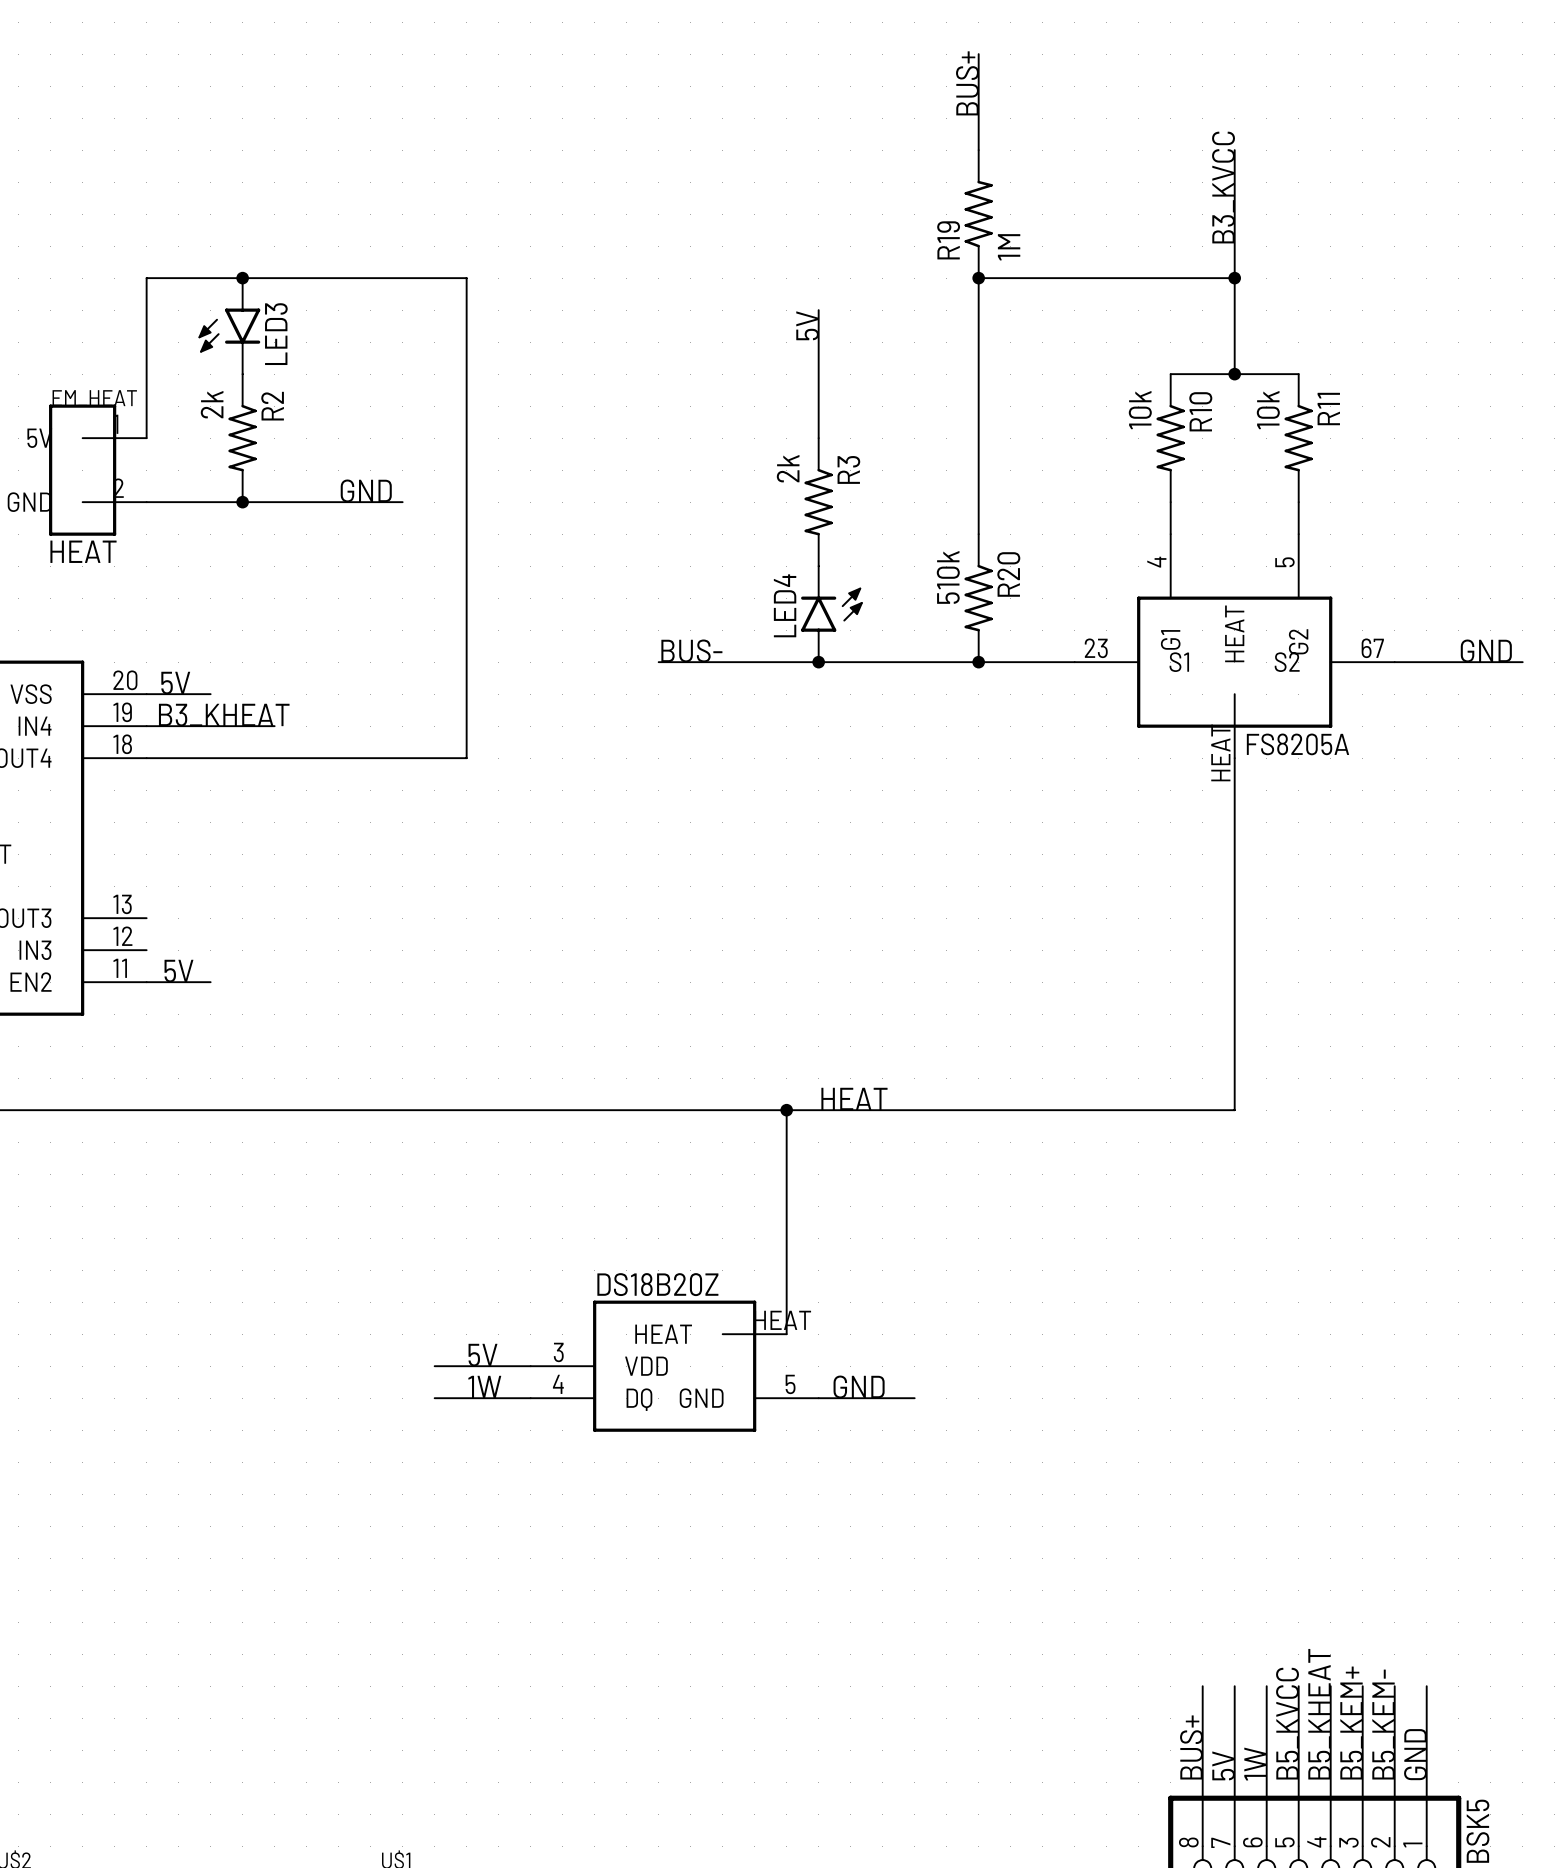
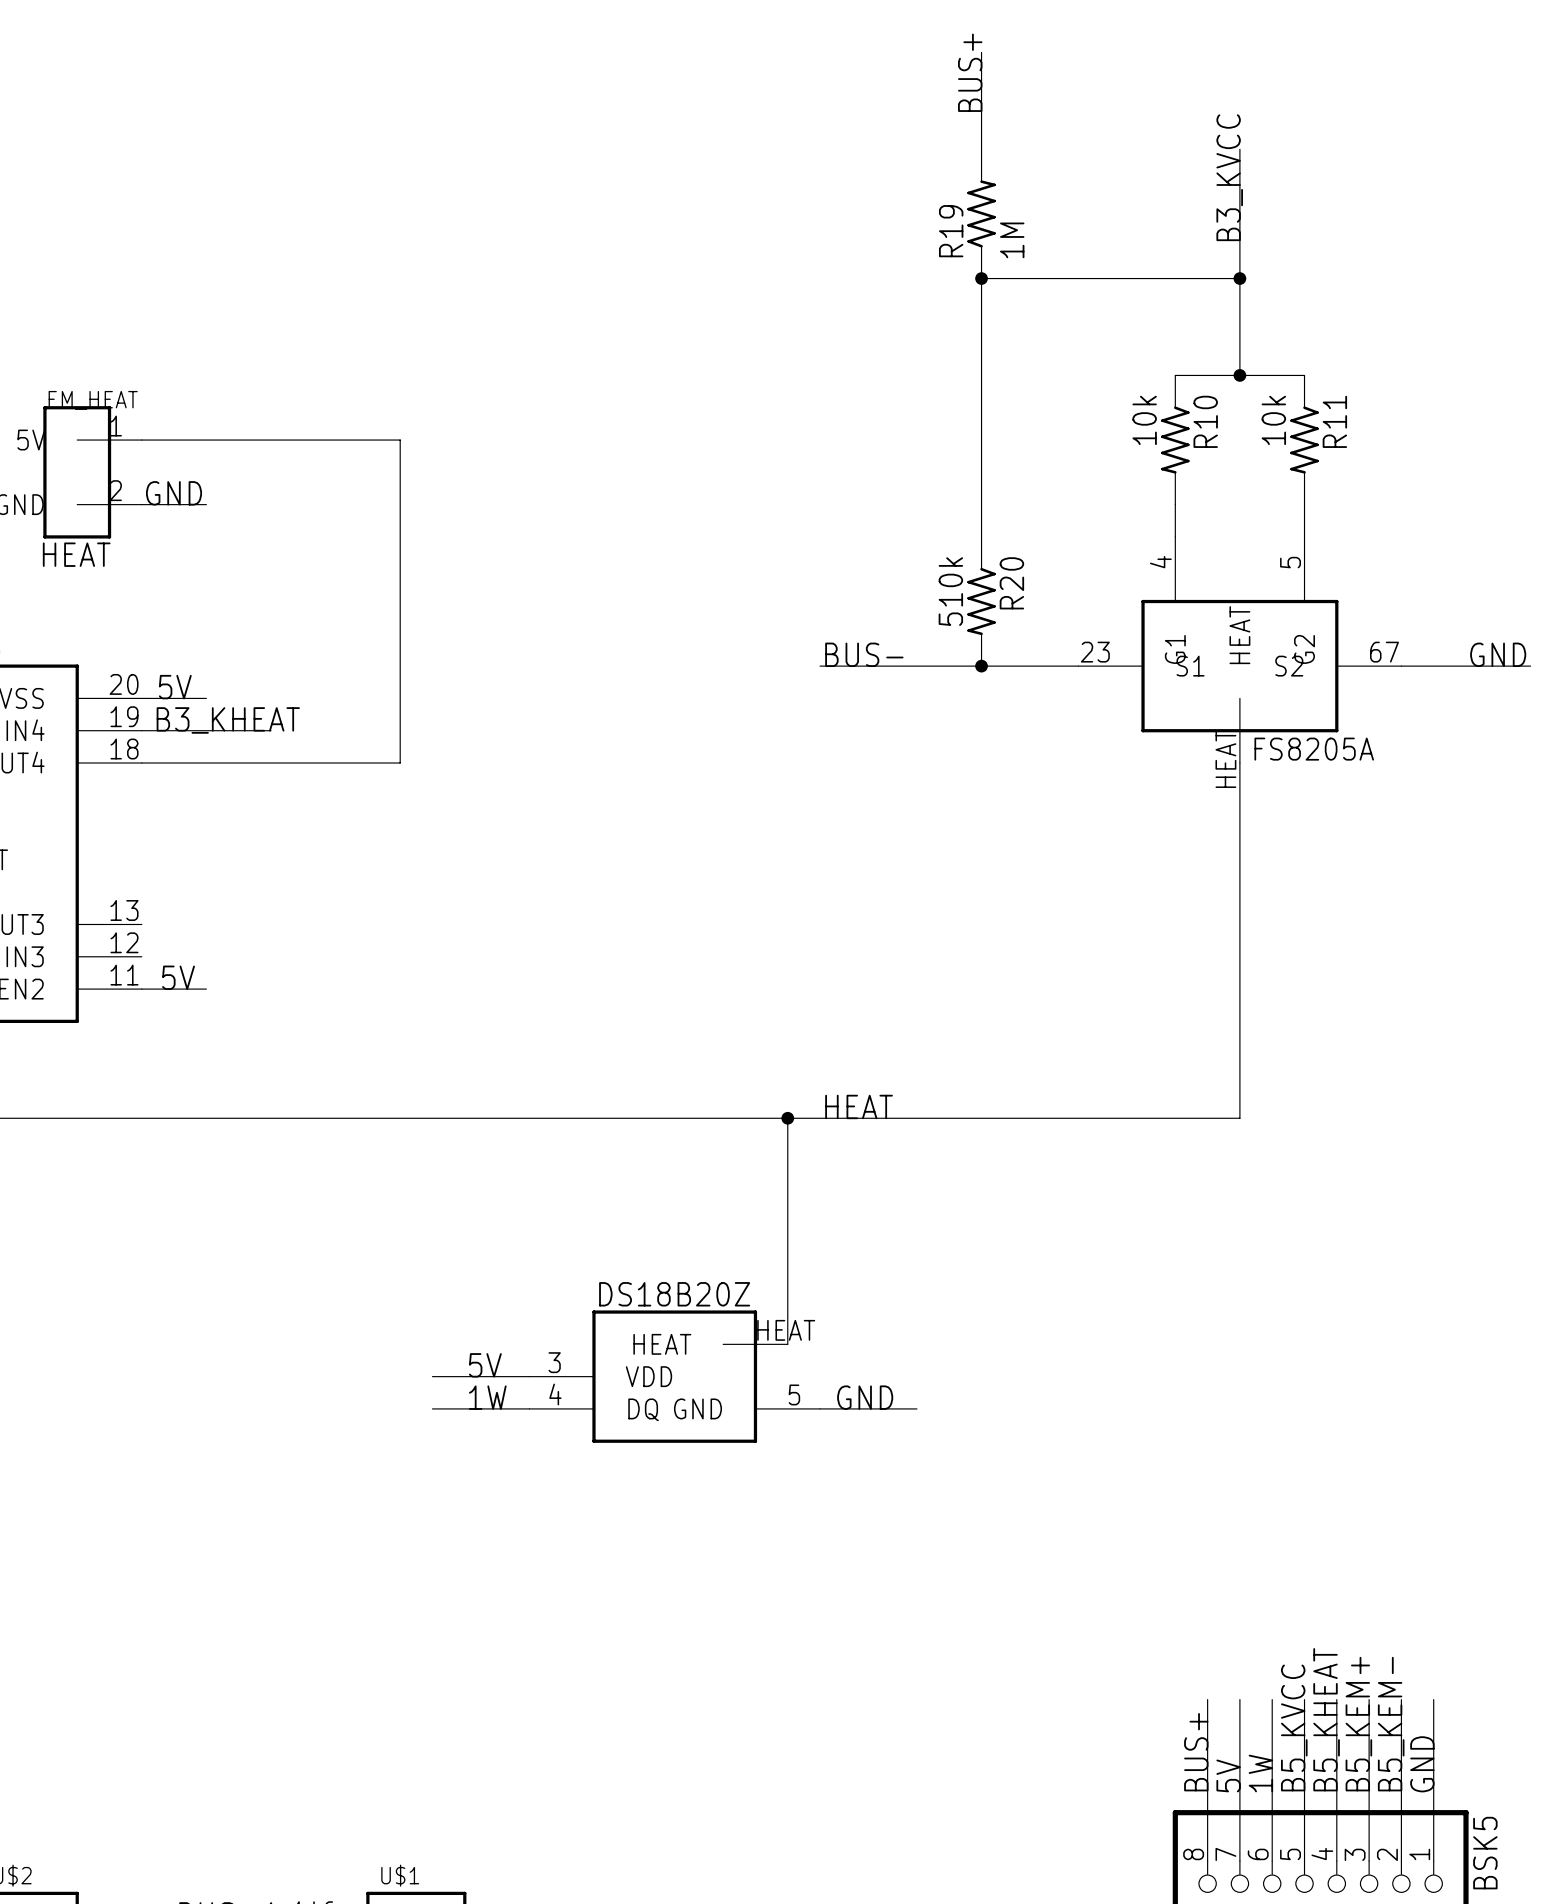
junction: (242, 278) -> none
wire: (818, 310) (818, 438) -> none
label: 5V (807, 325) -> none
LED3: (229, 326) -> none
wire: (146, 438) (146, 278) (466, 278) (466, 758) (402, 758) -> (141, 440) (400, 440) (400, 763)
R2: 2k (242, 438) -> none
label position: GND (366, 490) -> GND (174, 493)
wire: (210, 502) (402, 502) -> none
junction: (242, 502) -> none
R3: 2k (818, 502) -> none
LED4: (831, 614) -> none
label position: BUS- (691, 650) -> BUS- (864, 654)
wire: (658, 662) (818, 662) -> none
junction: (818, 662) -> none

